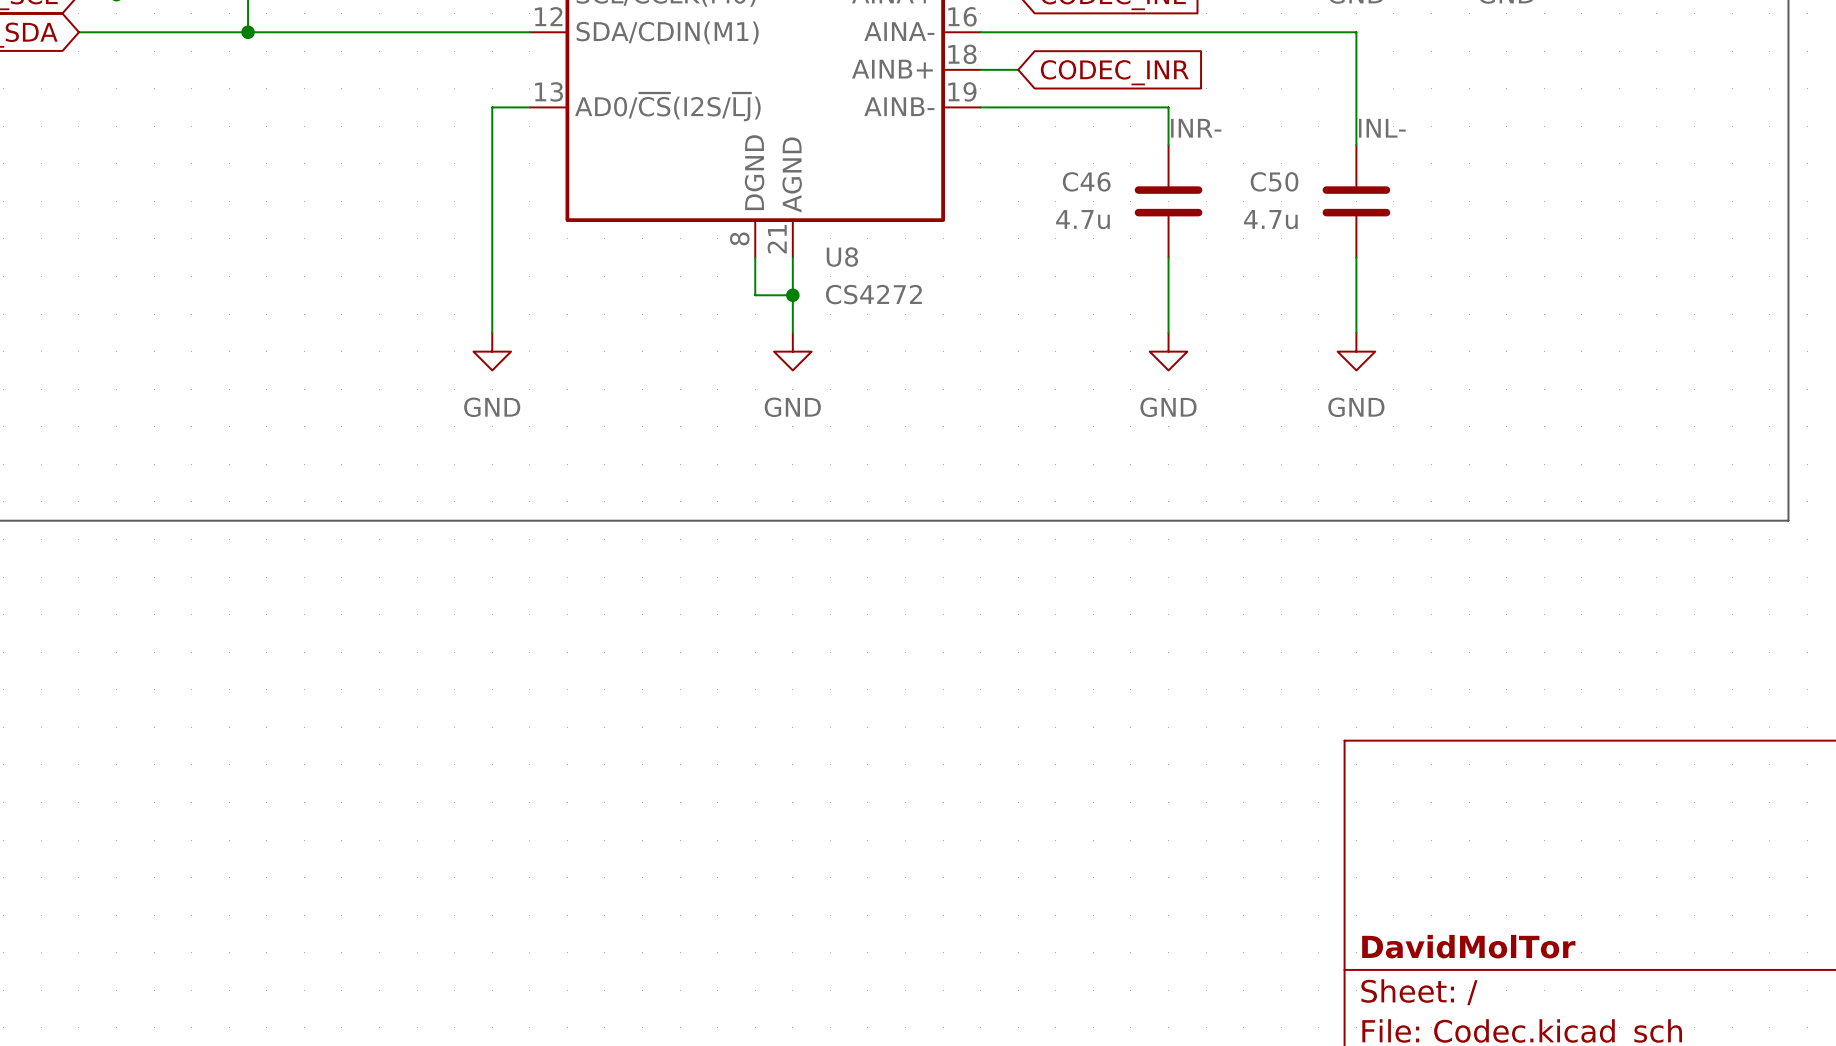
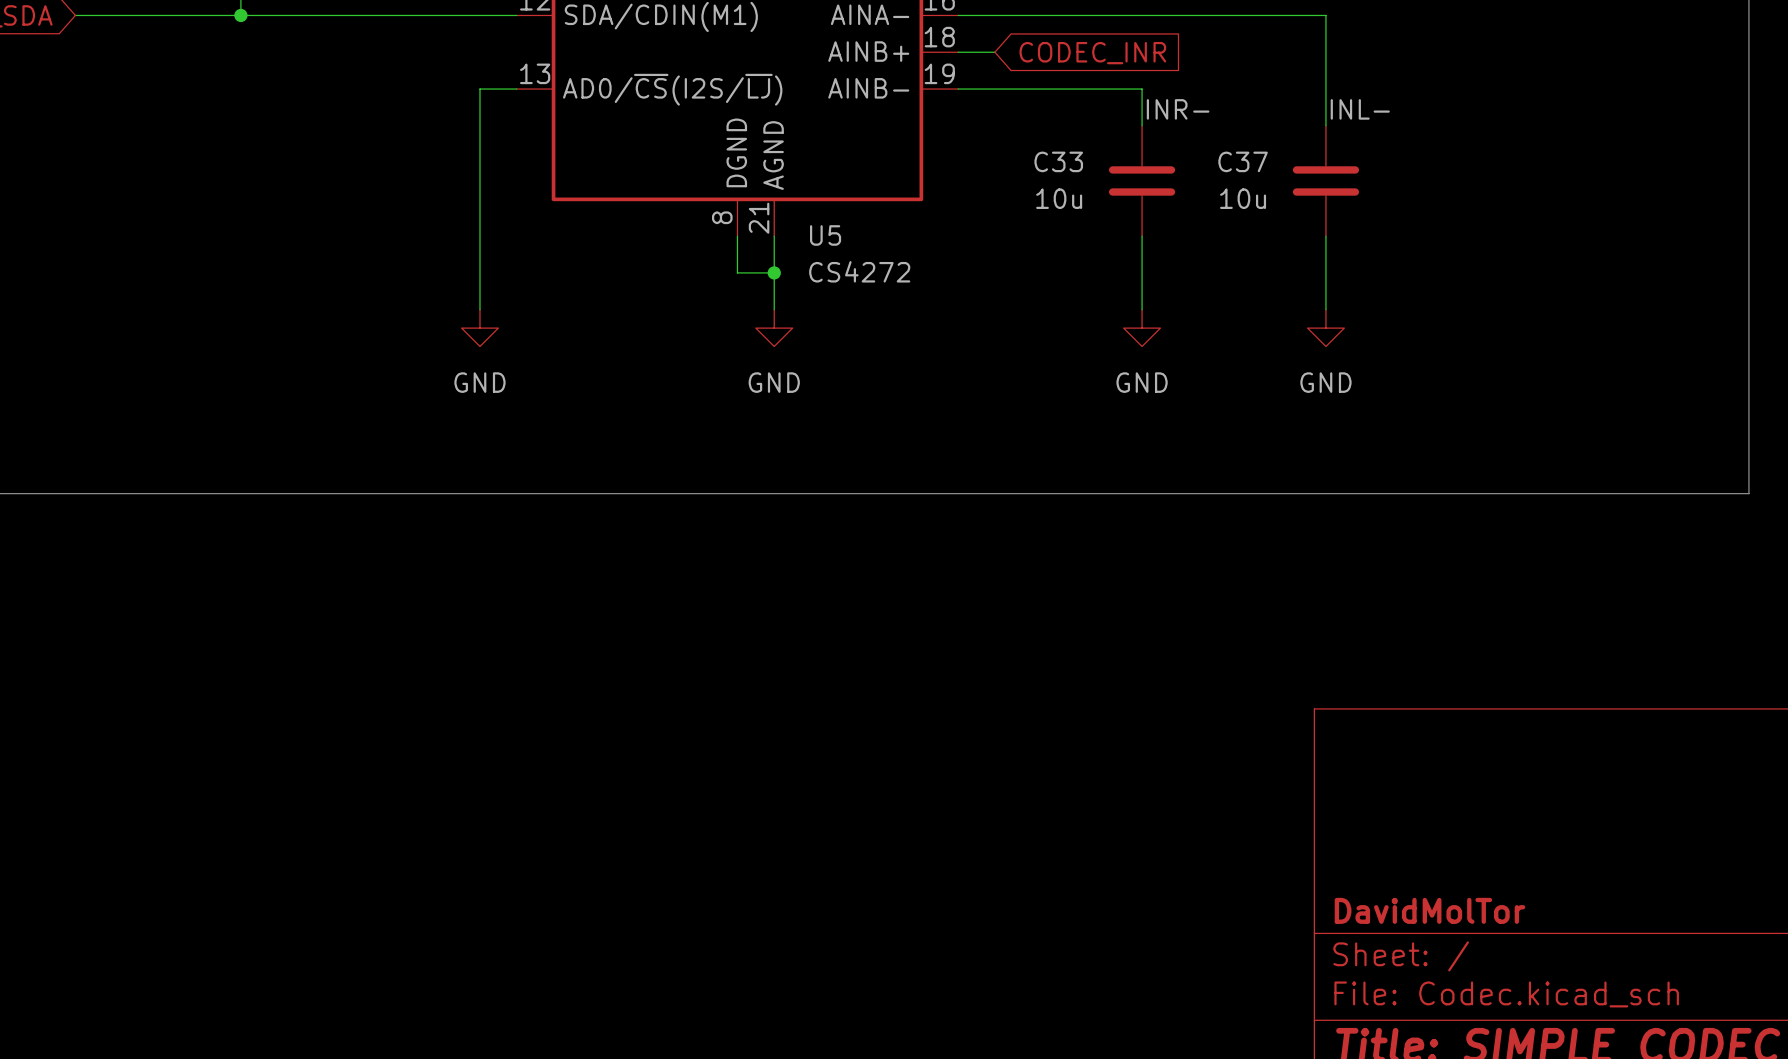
C46 name: C46 (1086, 181) -> C33 (1058, 161)
C50 name: C50 (1274, 181) -> C37 (1243, 161)
C46 value: 4.7u (1082, 219) -> 10u (1059, 198)
C50 value: 4.7u (1270, 219) -> 10u (1243, 198)
U8 name: U8 (842, 257) -> U5 (825, 235)

